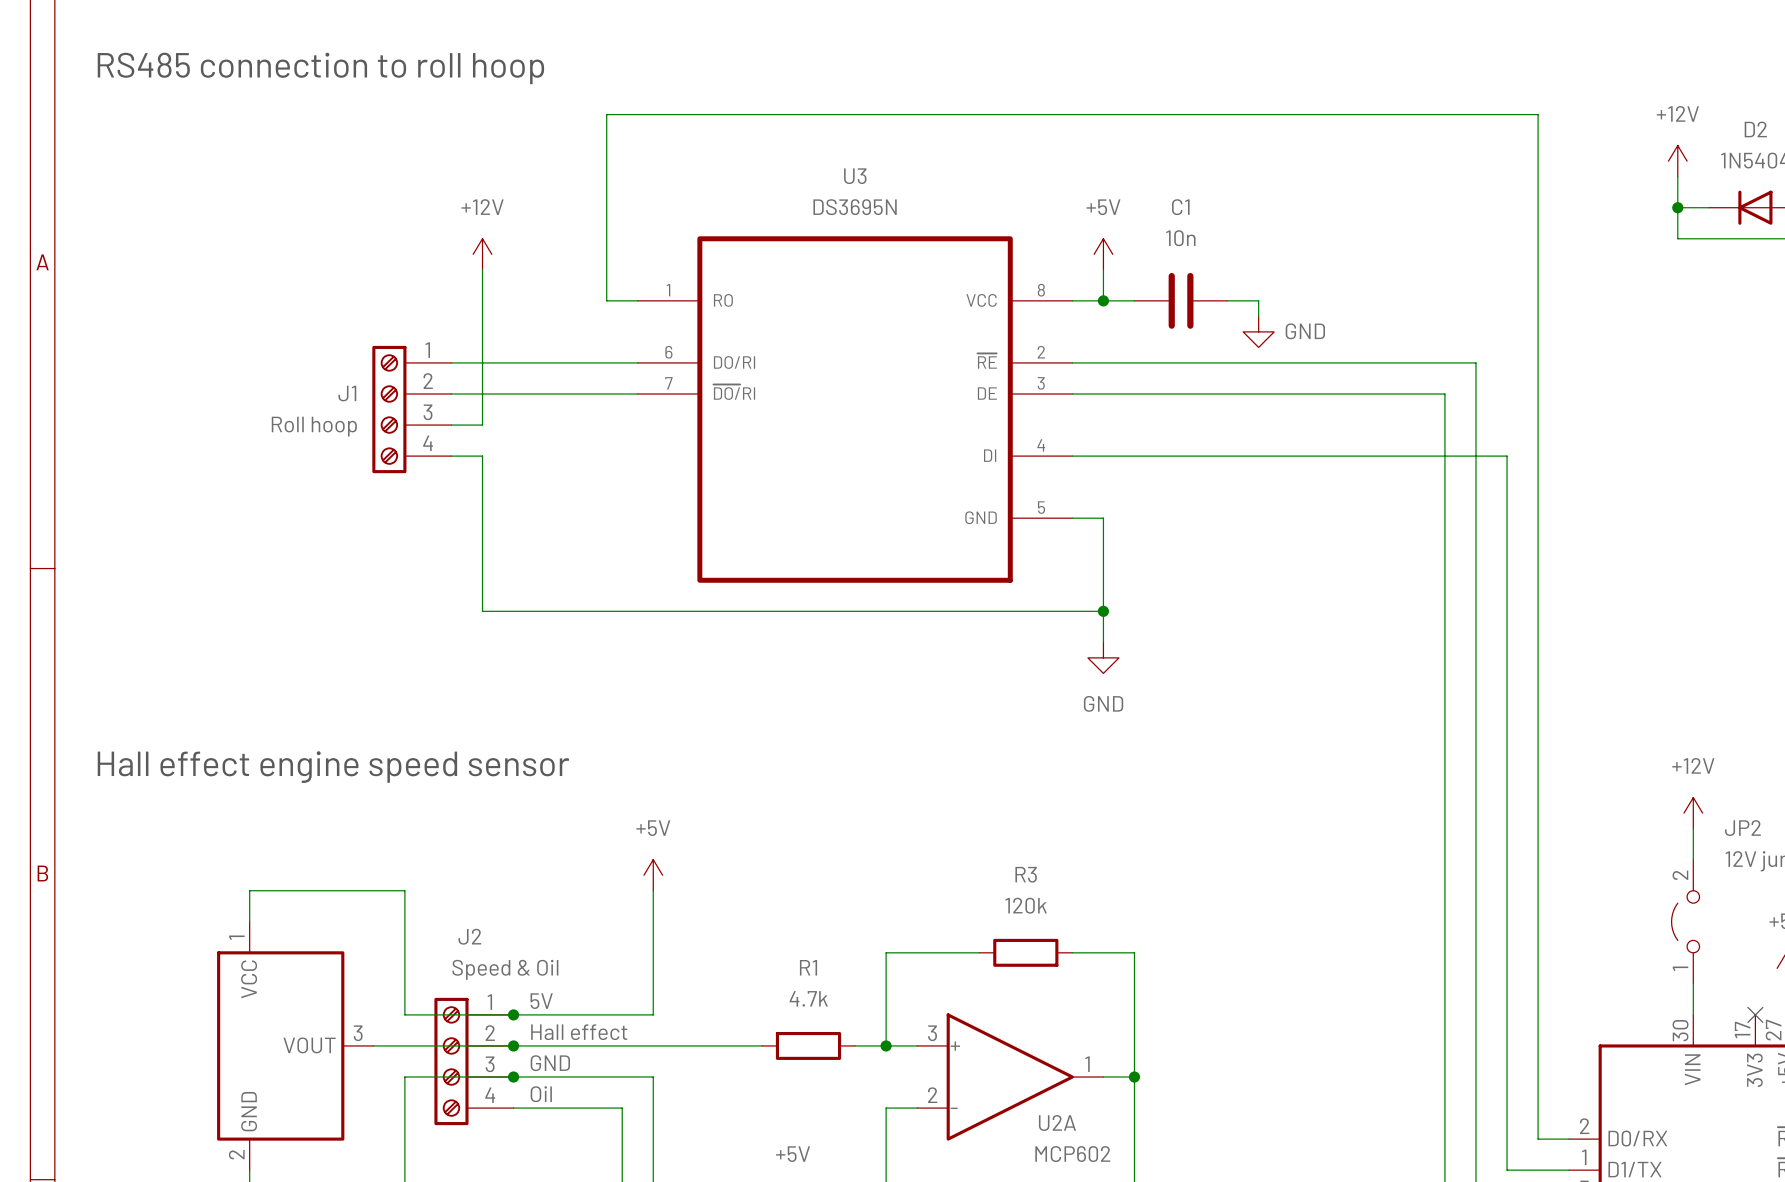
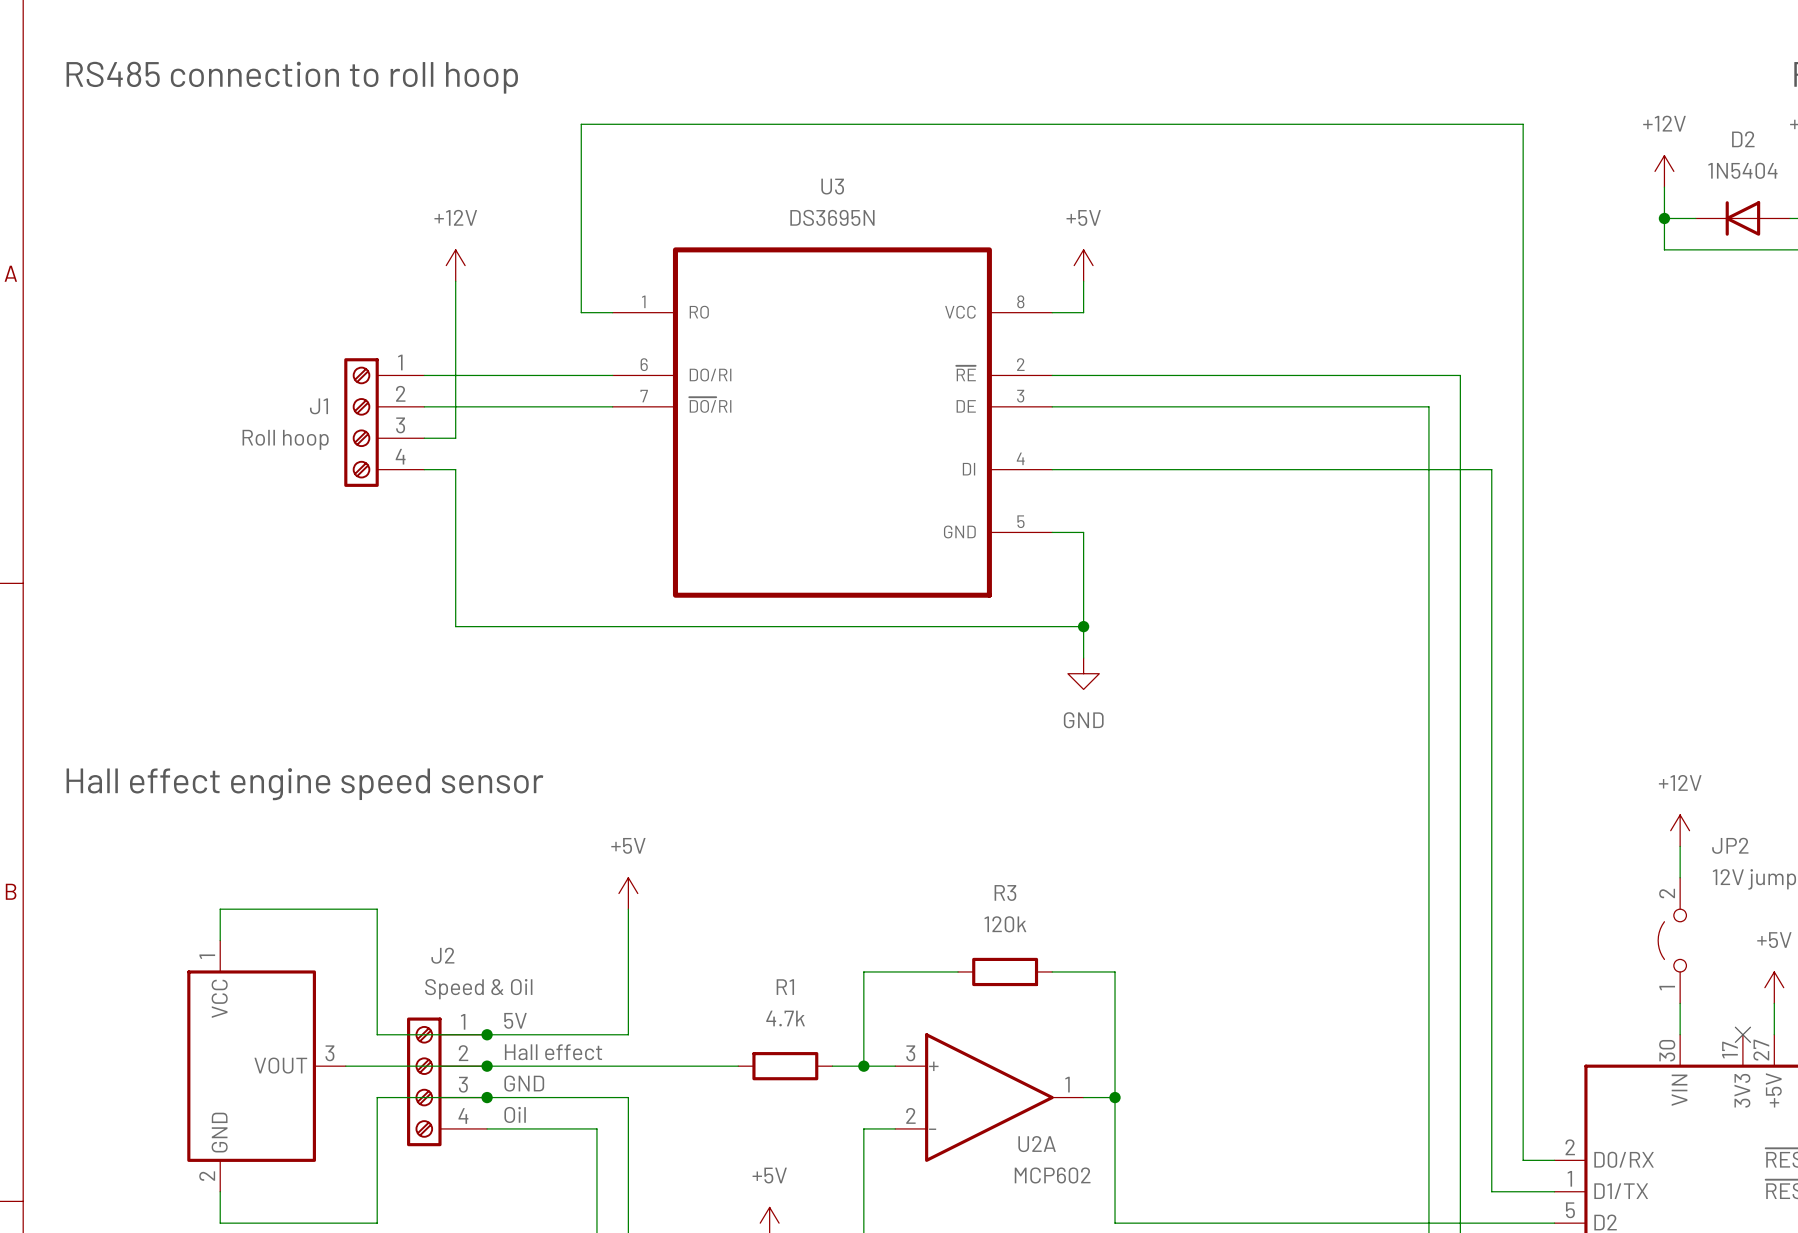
wire: (1103, 300) (1134, 300) -> none
junction: (1103, 300) -> none
C1: 10n (1181, 300) -> none
wire: (1227, 300) (1258, 300) (1258, 316) -> none
power symbol: GND (1258, 331) -> none

